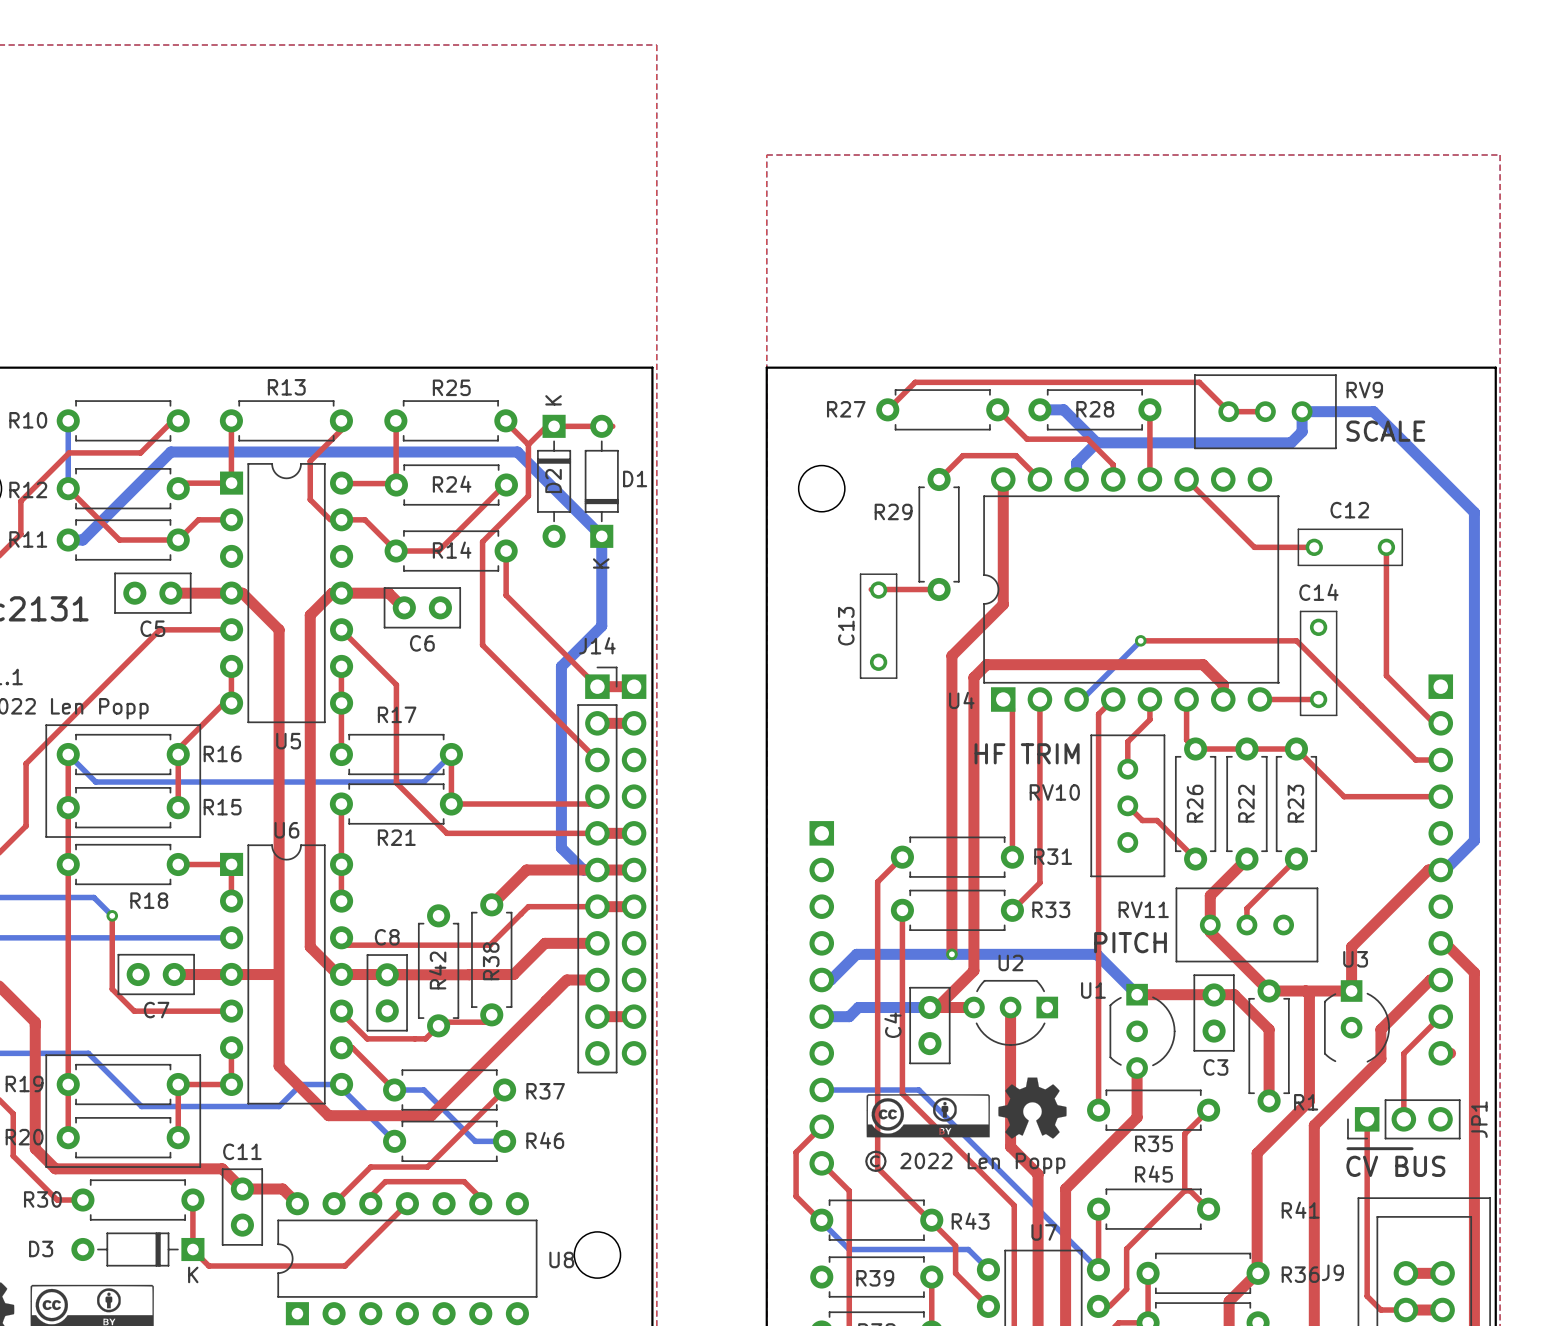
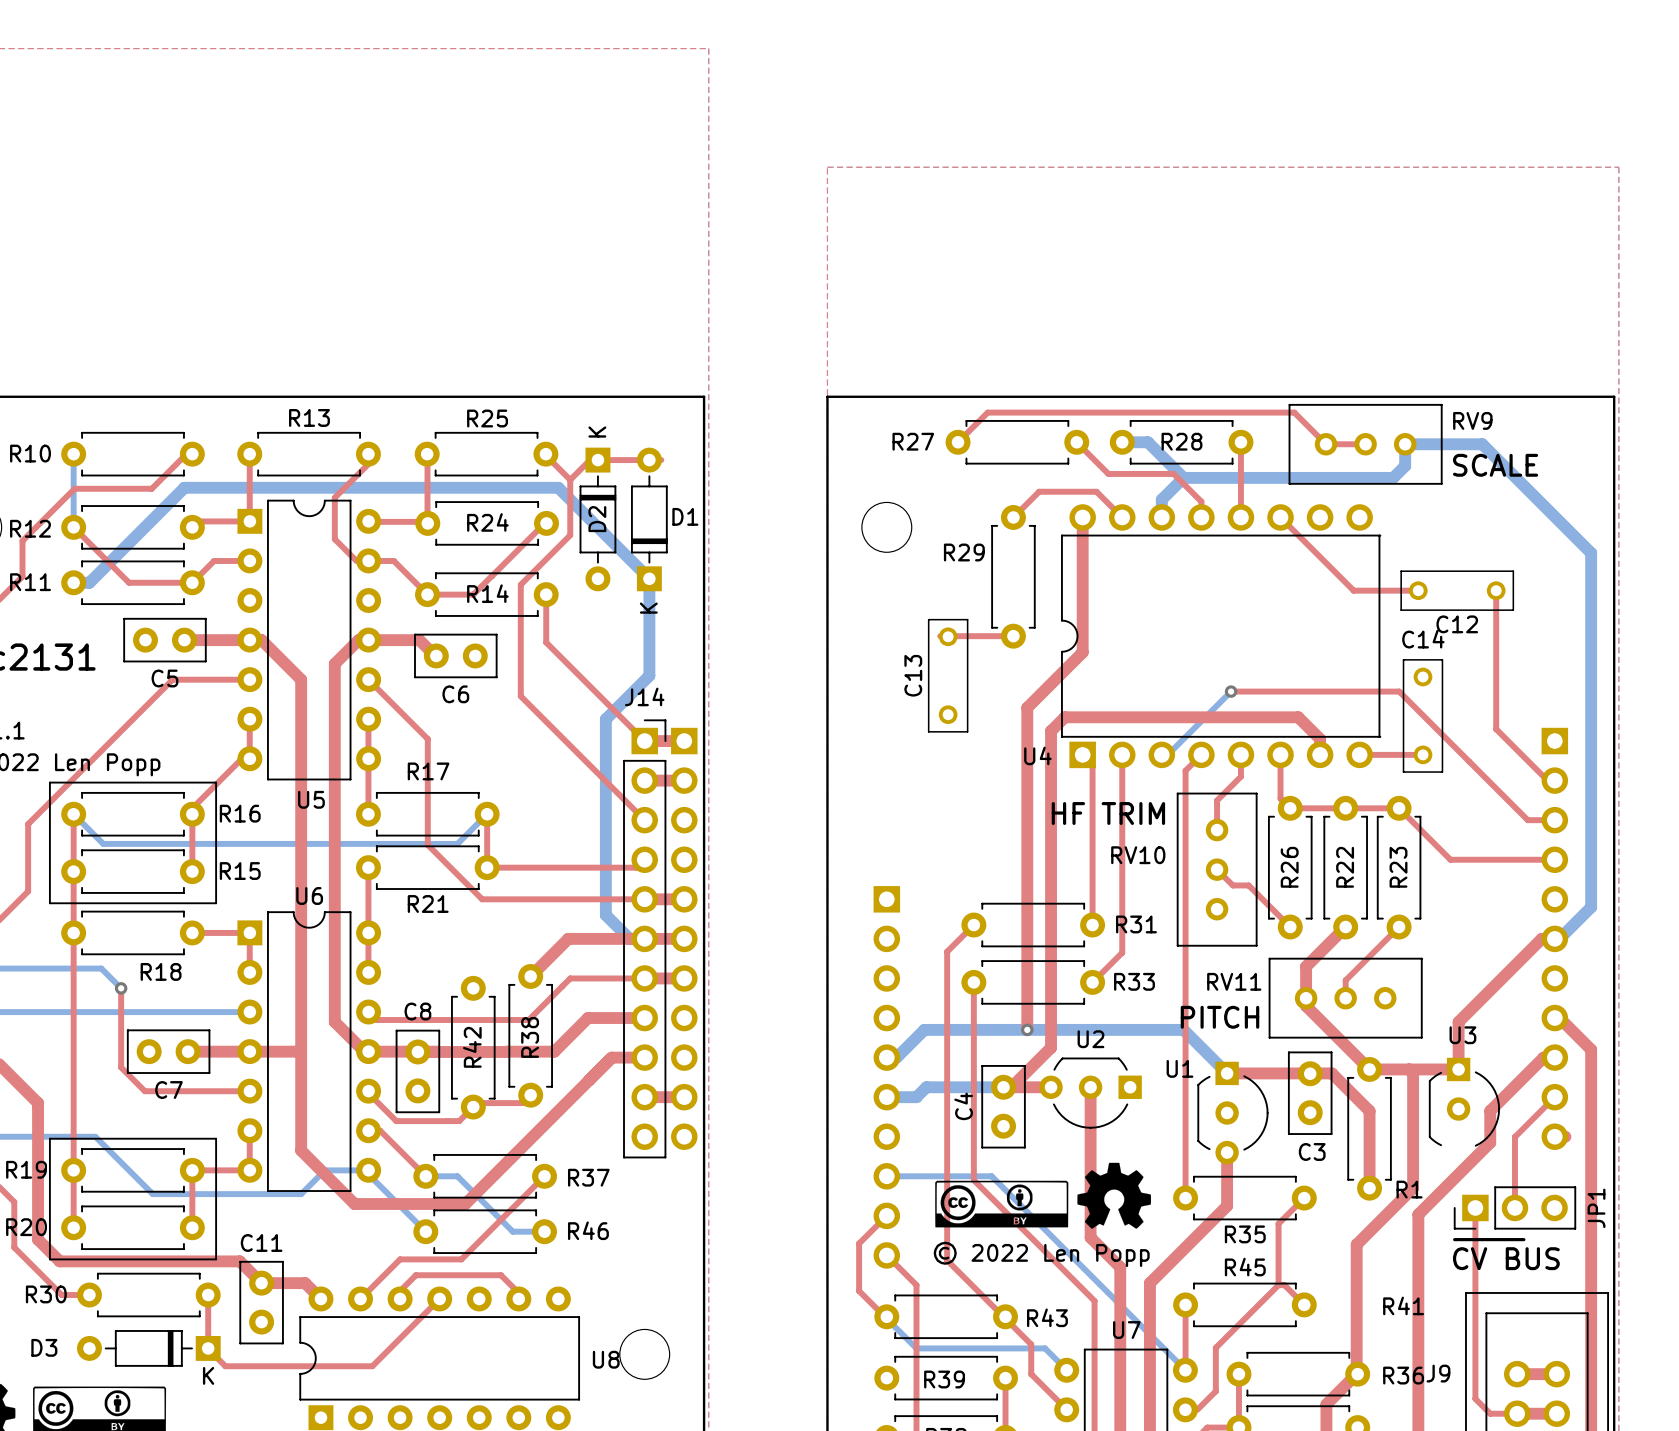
C12 name position: C12 (1349, 510) -> C12 (1457, 624)

